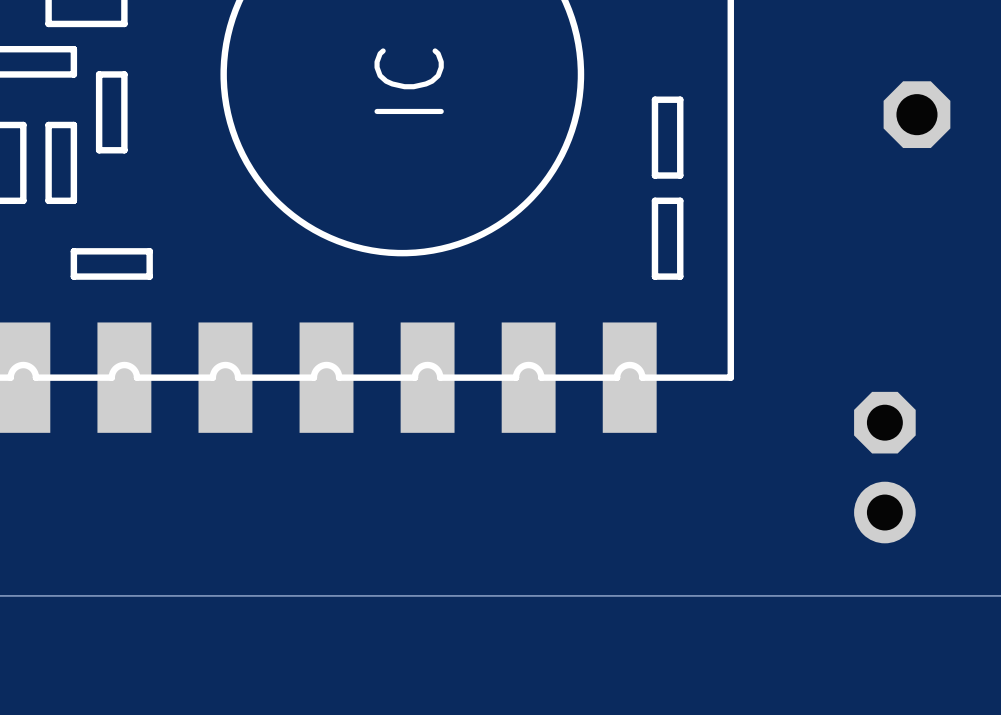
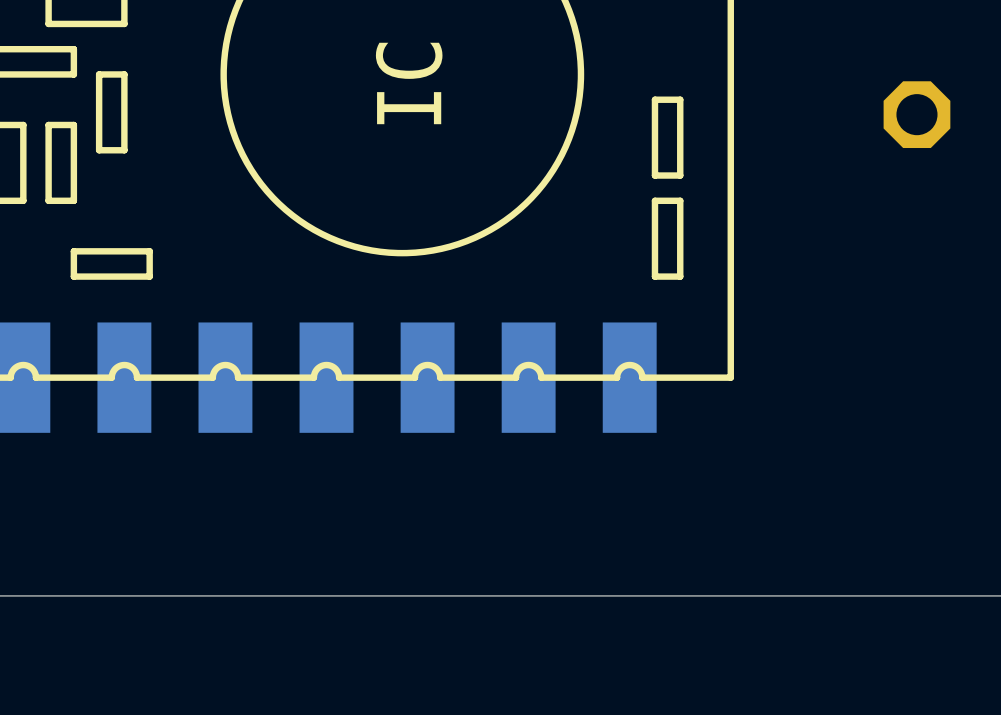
part: (884, 467) -> none

